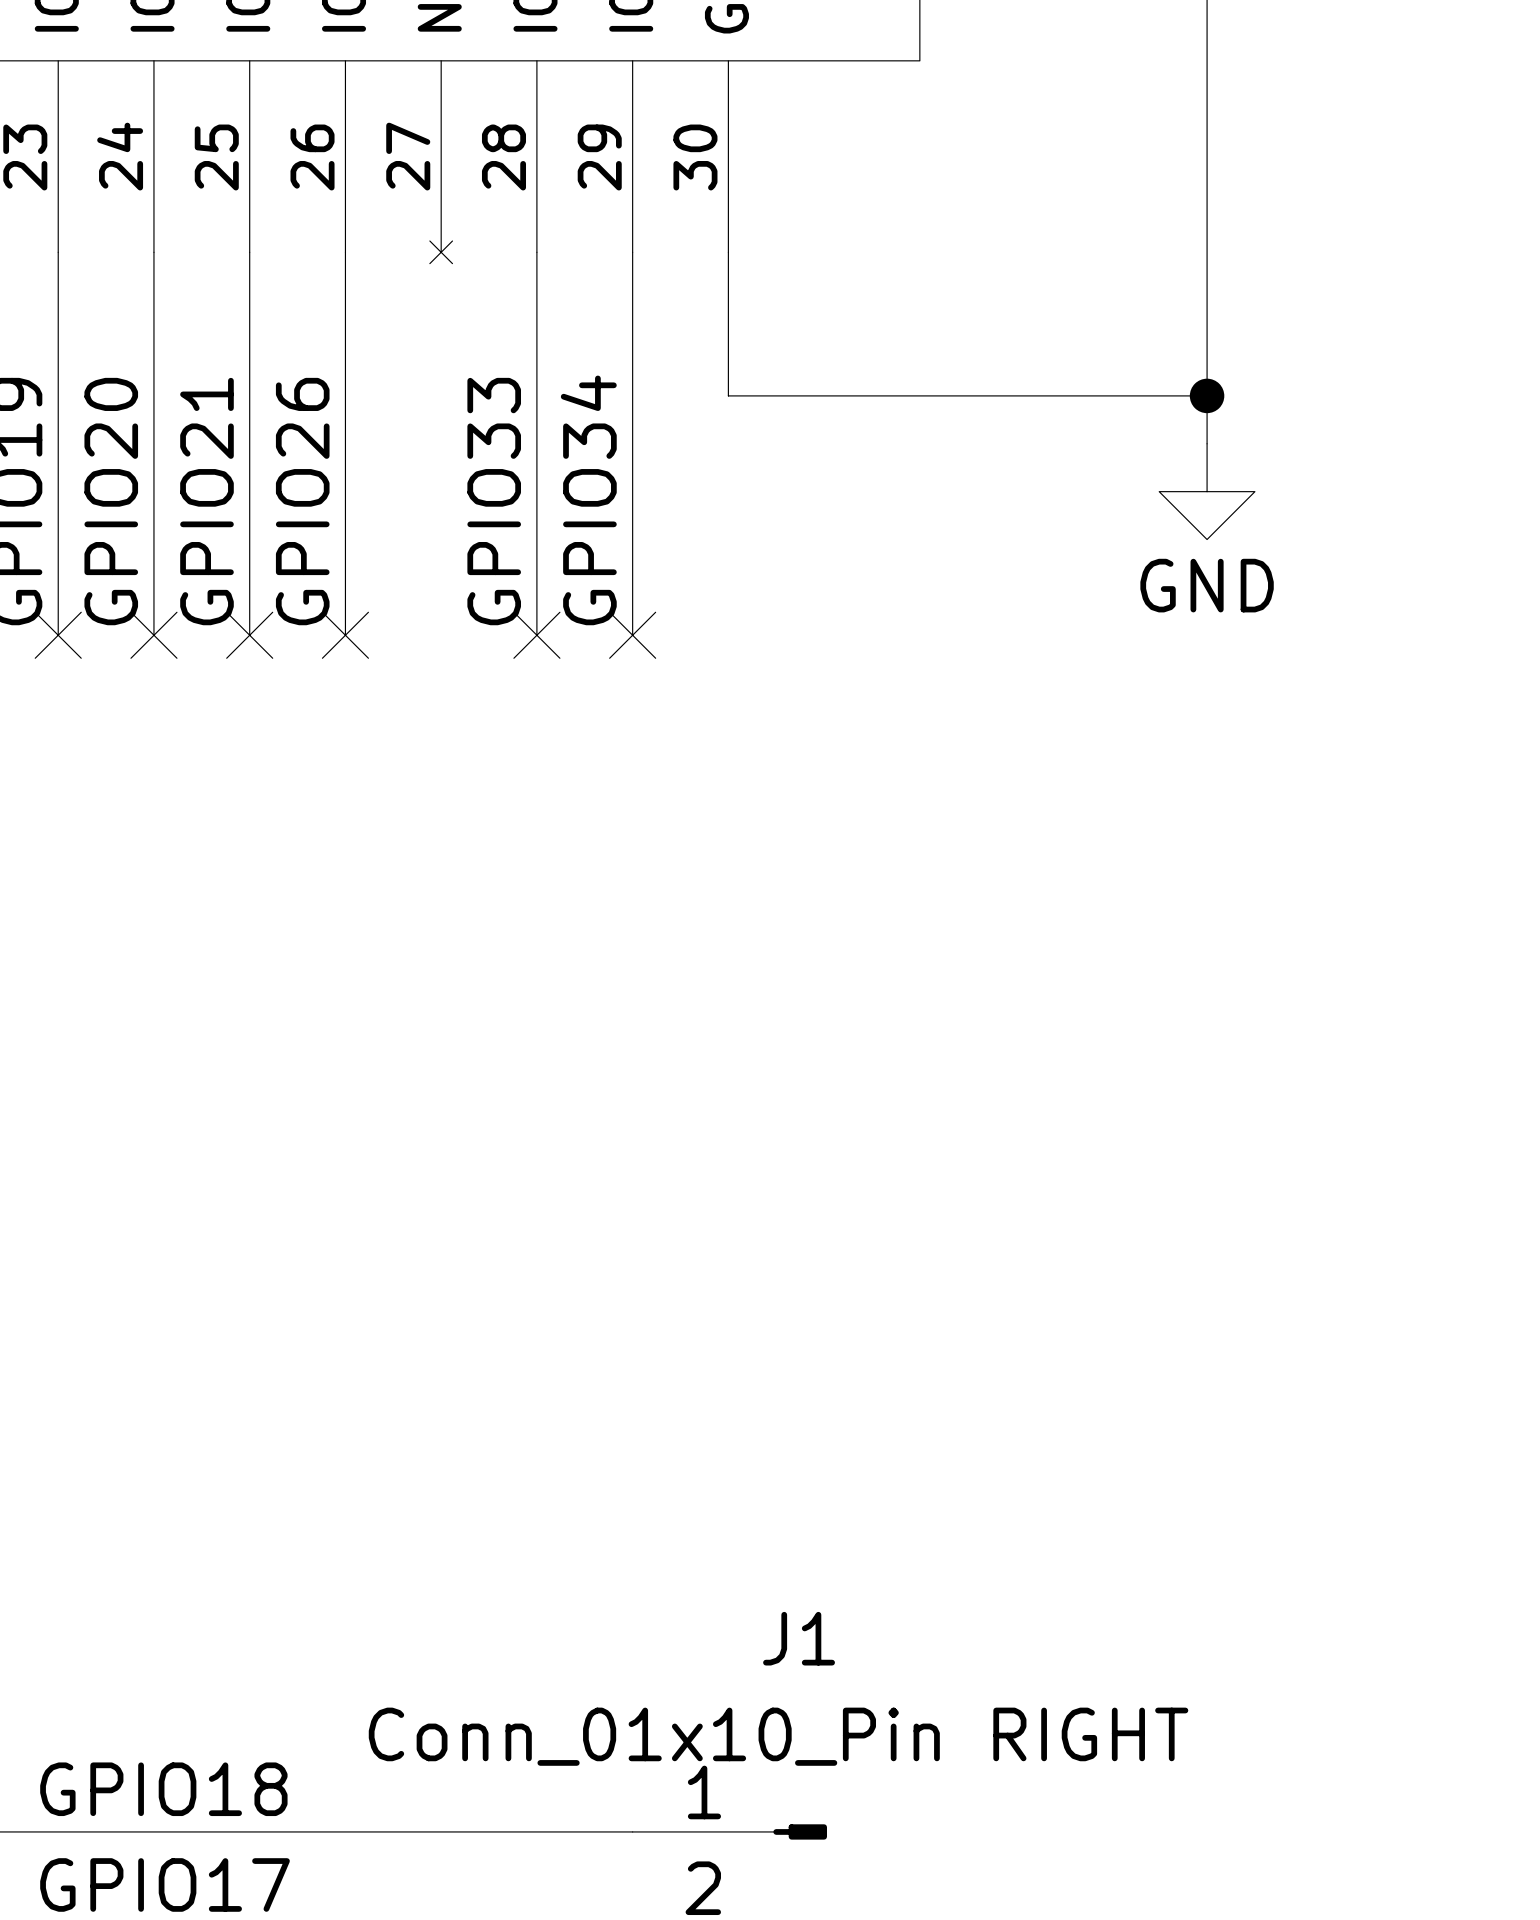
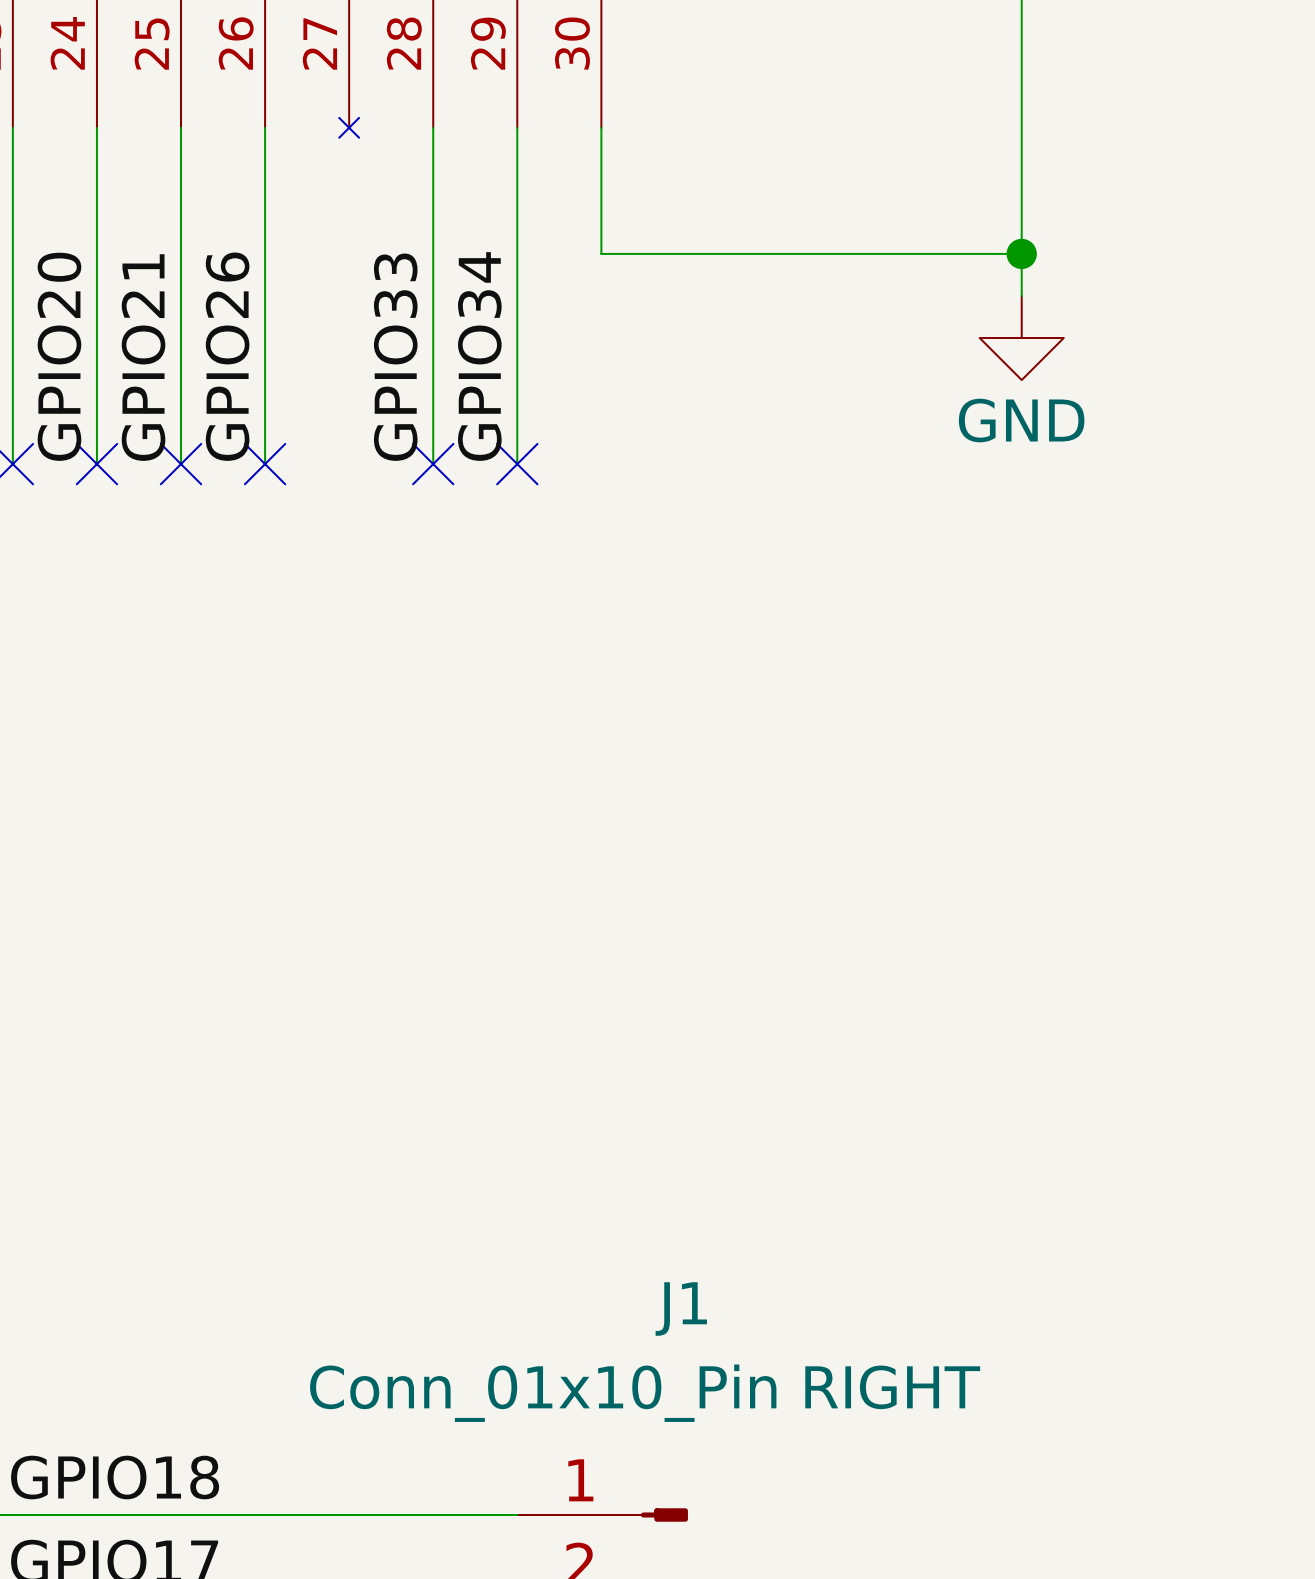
J1 name position: J1 (799, 1638) -> J1 (681, 1309)
J1 value position: Conn_01x10_Pin RIGHT (778, 1736) -> Conn_01x10_Pin RIGHT (645, 1393)

